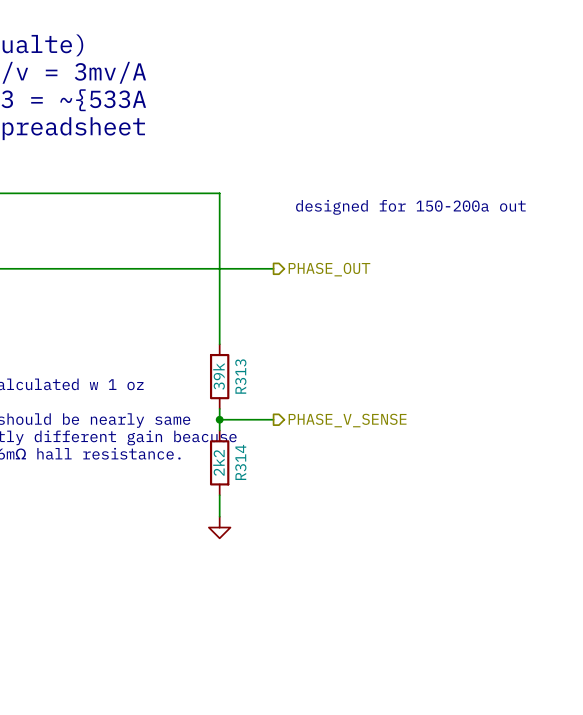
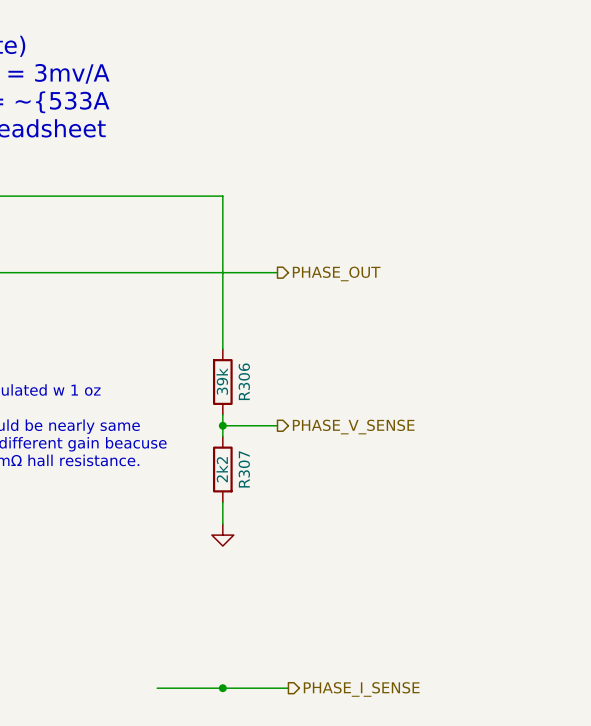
text: designed for 150-200a out (410, 207) -> none
R313 name: R313 (240, 376) -> R306 (244, 381)
R314 name: R314 (240, 462) -> R307 (244, 469)
wire: none -> (157, 688) (288, 688)
junction: none -> (222, 688)
hierarchical label: none -> PHASE_I_SENSE (361, 689)

